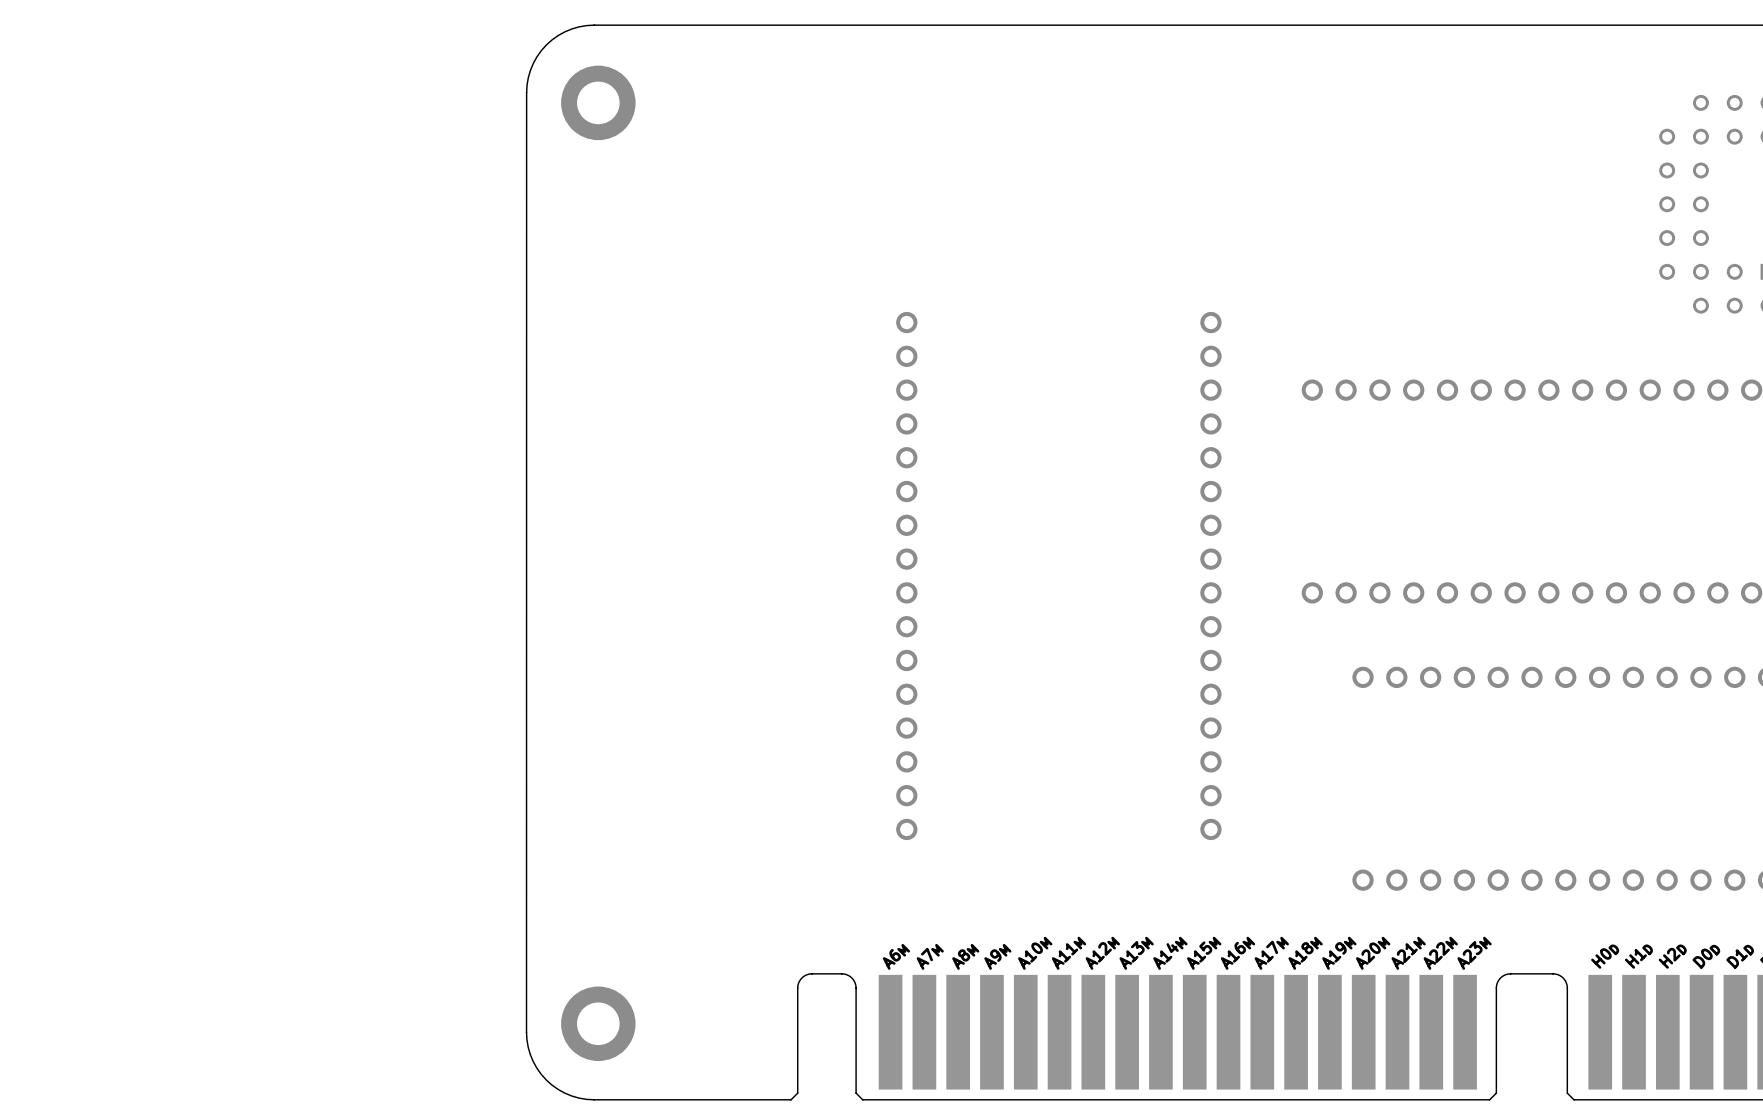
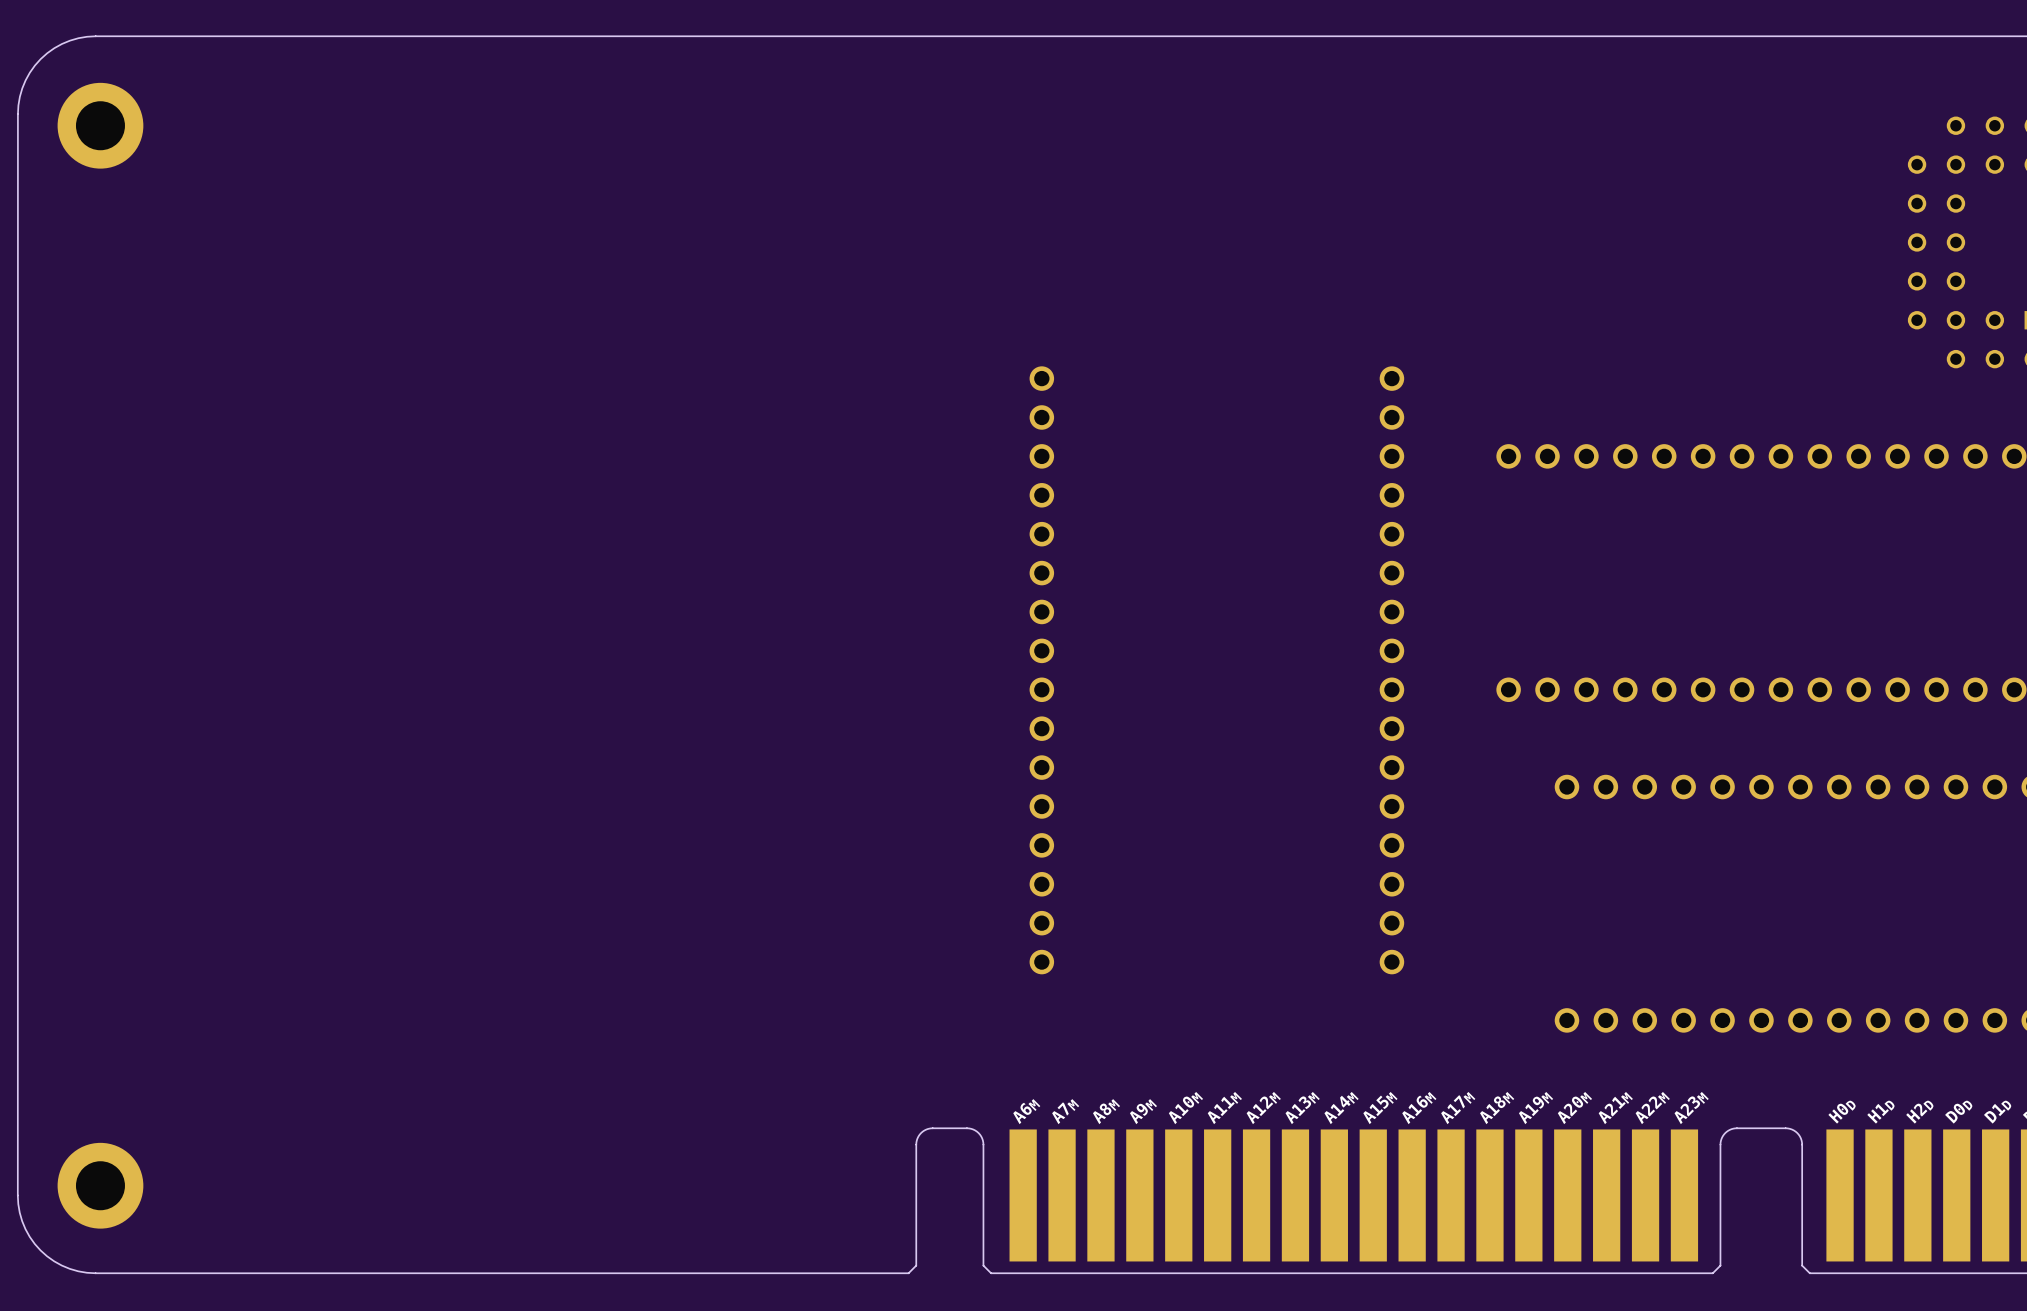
board edge: (594, 25) (571, 28) (558, 35) (546, 44) (533, 63) (527, 85) (526, 1032) (530, 1054) (536, 1068) (546, 1080) (558, 1089) (571, 1096) (594, 1099) -> (682, 36) (95, 36) (78, 38) (54, 48) (40, 59) (29, 72) (22, 88) (17, 114) (17, 1195) (22, 1221) (34, 1243) (47, 1256) (61, 1265) (86, 1272) (681, 1273)
part: none -> (100, 125)
part: (598, 102) -> none
part: none -> (100, 1185)
part: (598, 1023) -> none

